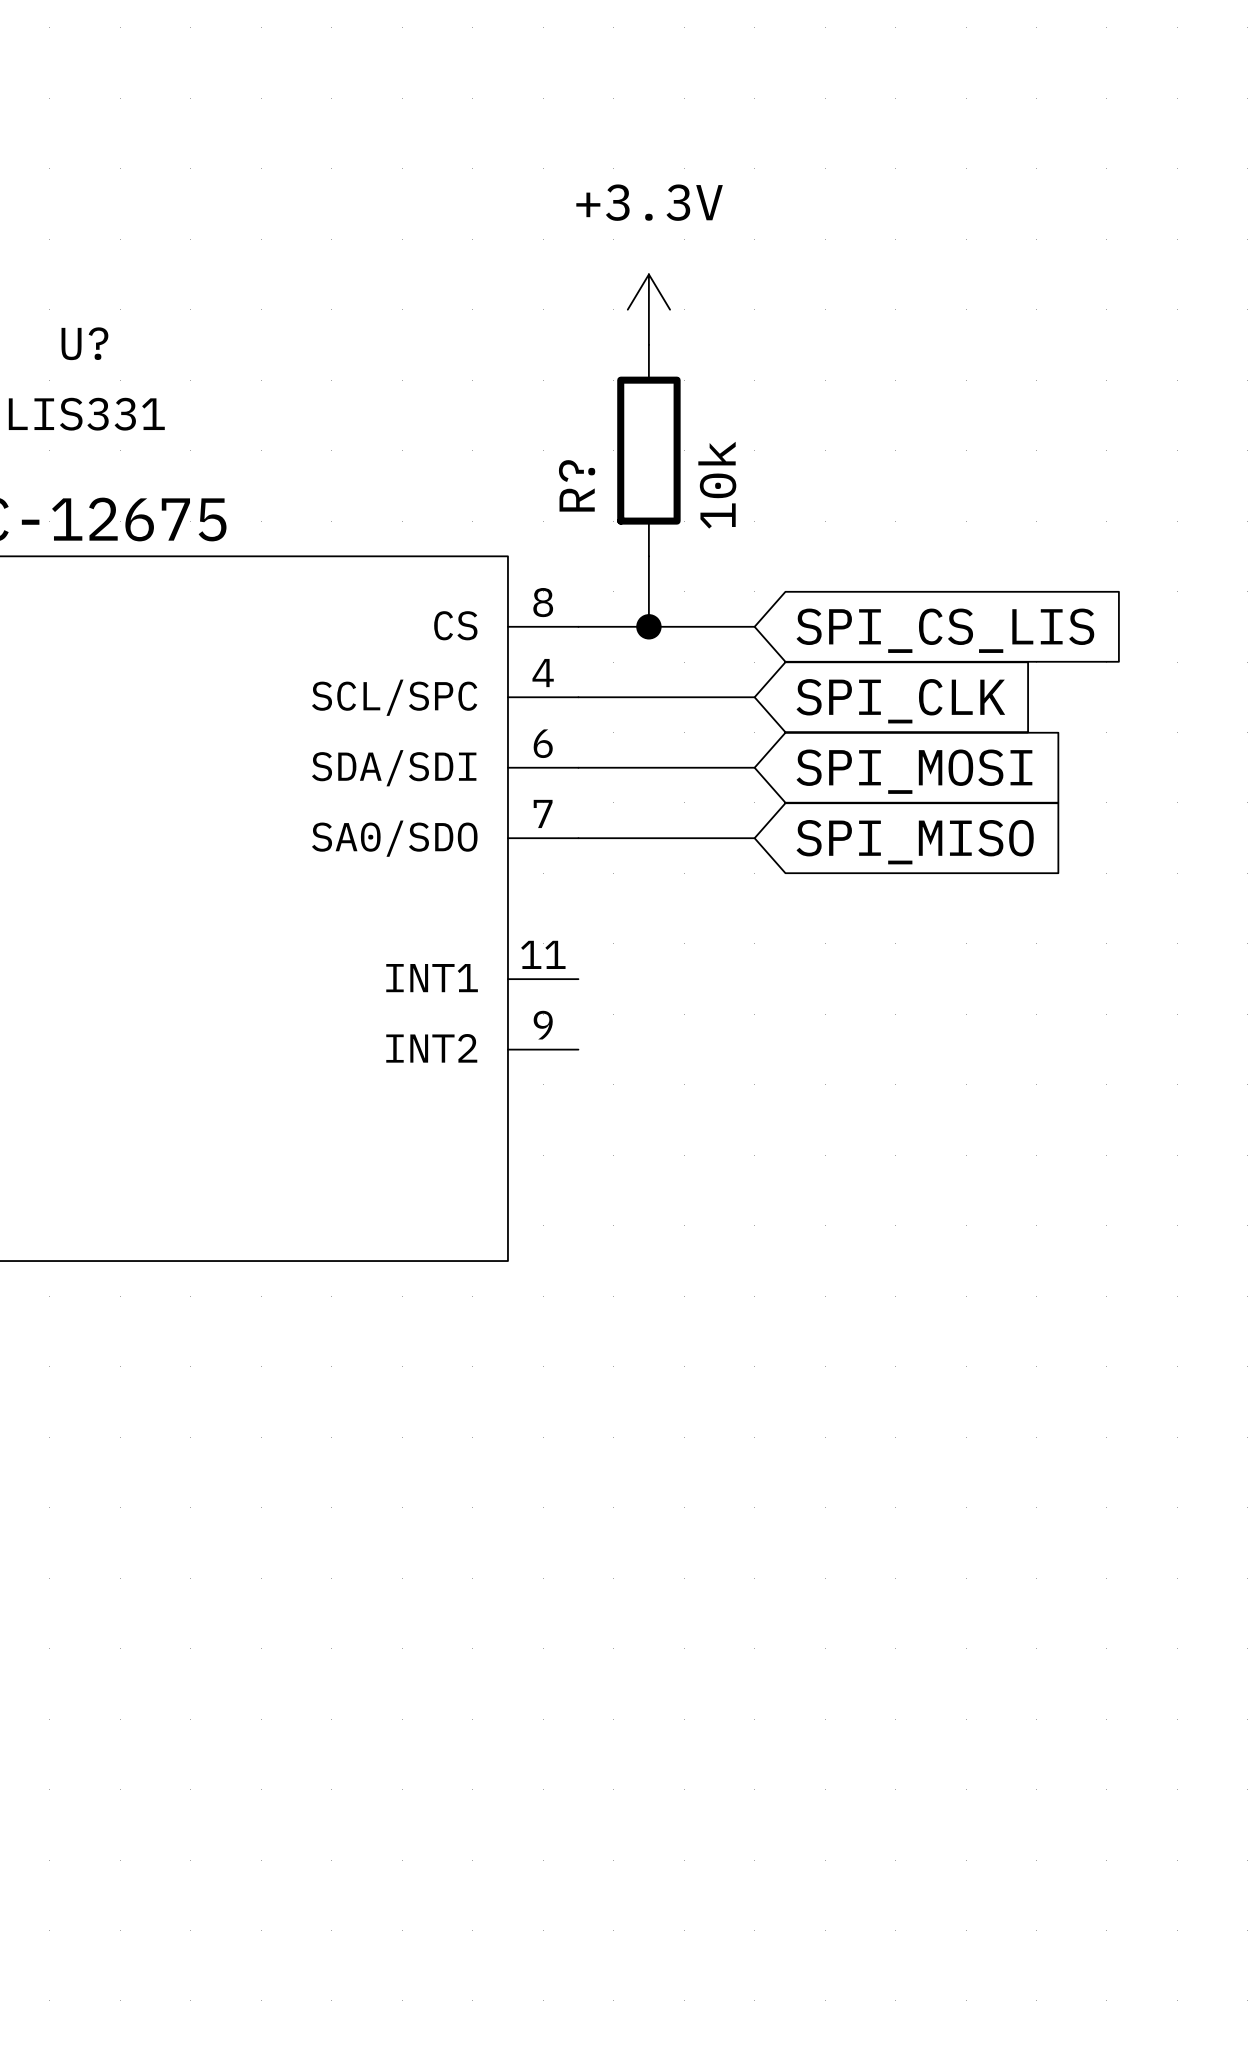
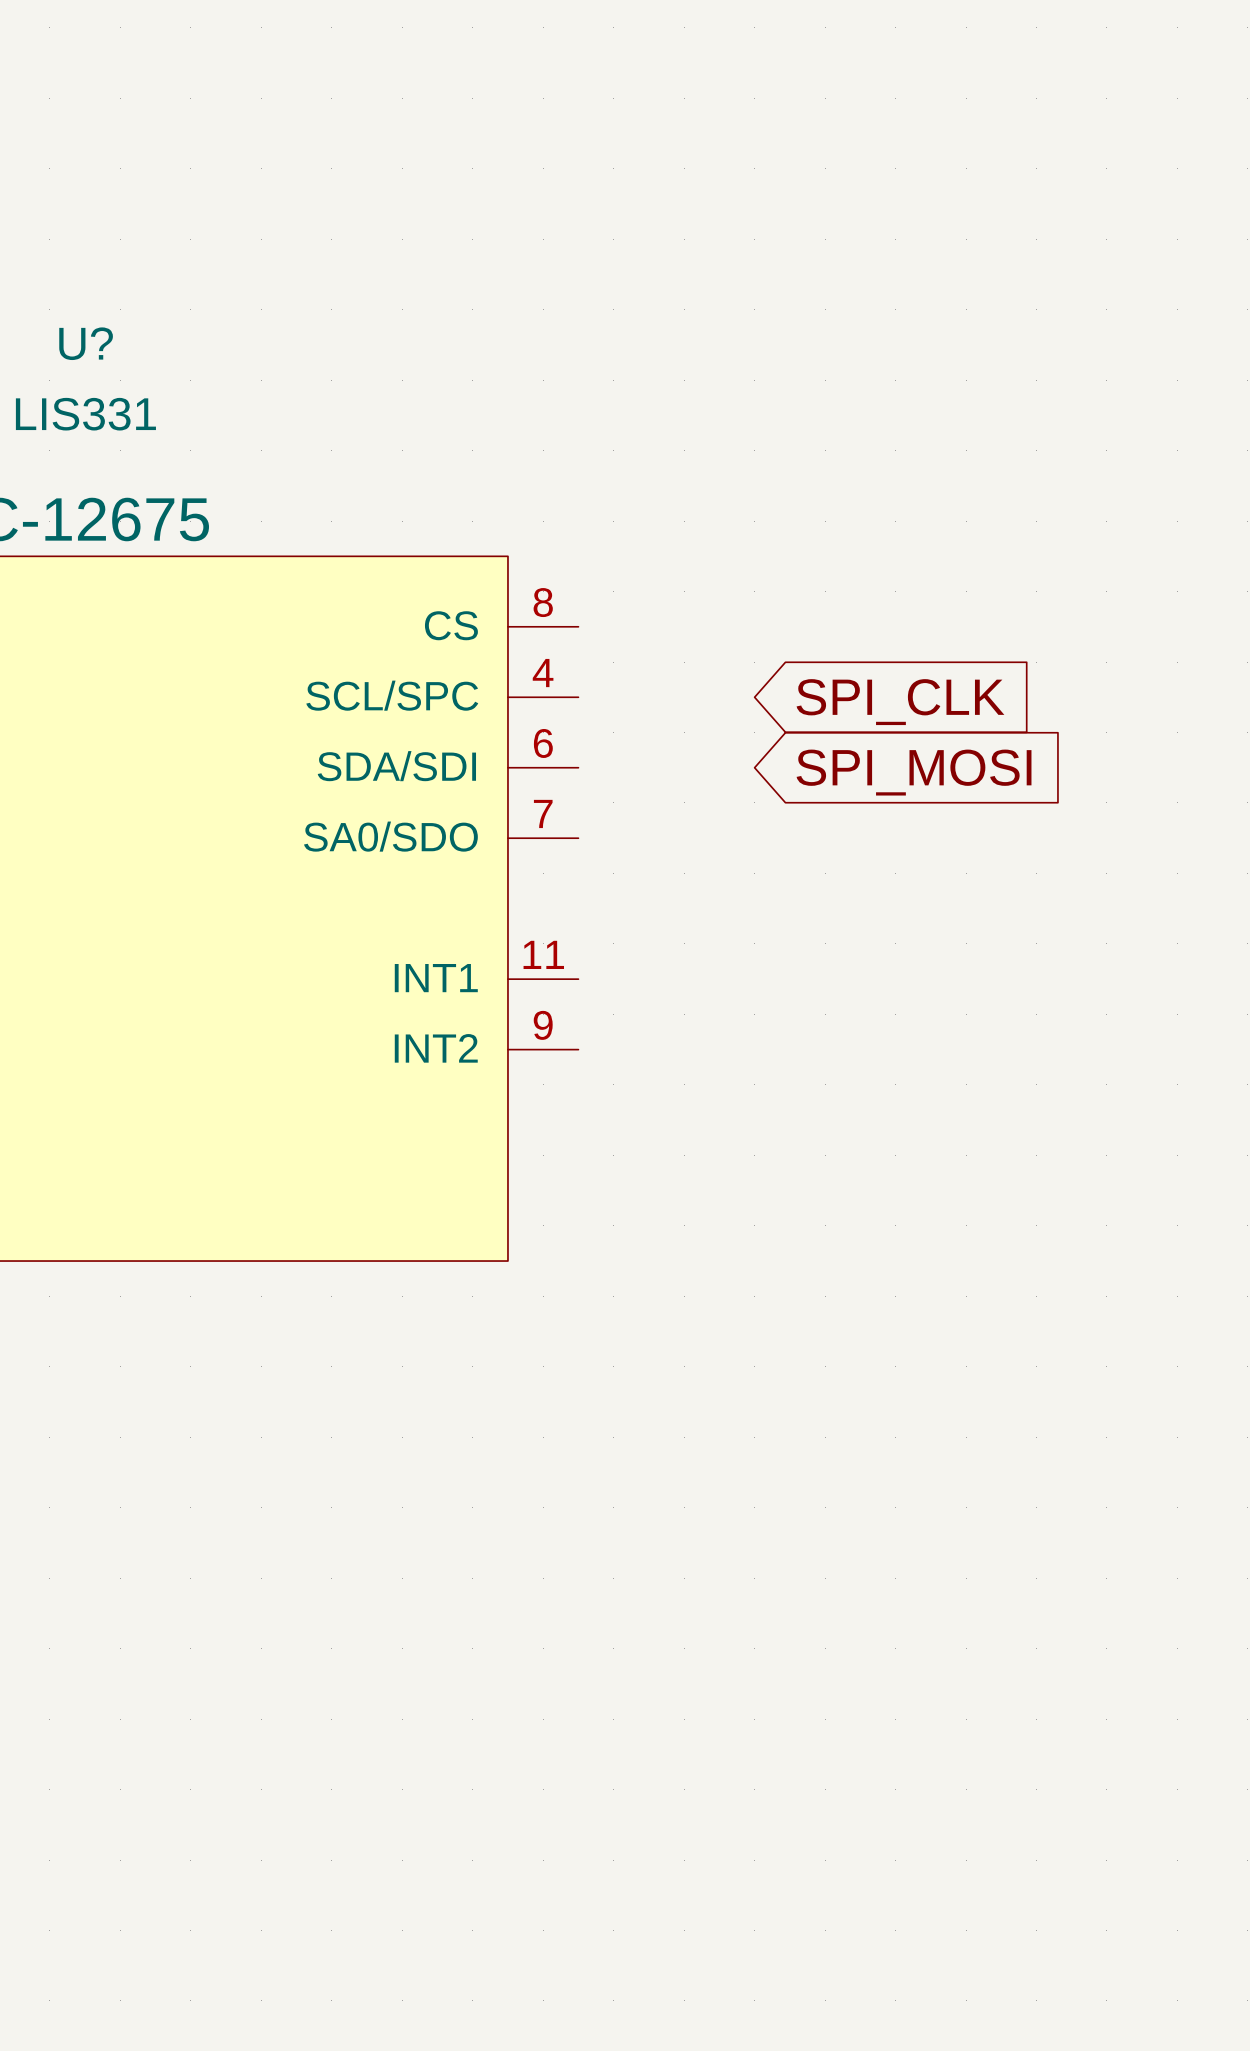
power symbol: +3.3V (648, 309) -> none
R?: 10k (648, 450) -> none
wire: (648, 556) (648, 626) -> none
wire: (578, 626) (754, 626) -> none
junction: (648, 626) -> none
global label: SPI_CS_LIS (945, 630) -> none
wire: (578, 697) (754, 697) -> none
wire: (578, 767) (754, 767) -> none
wire: (578, 838) (754, 838) -> none
global label: SPI_MISO (915, 842) -> none

